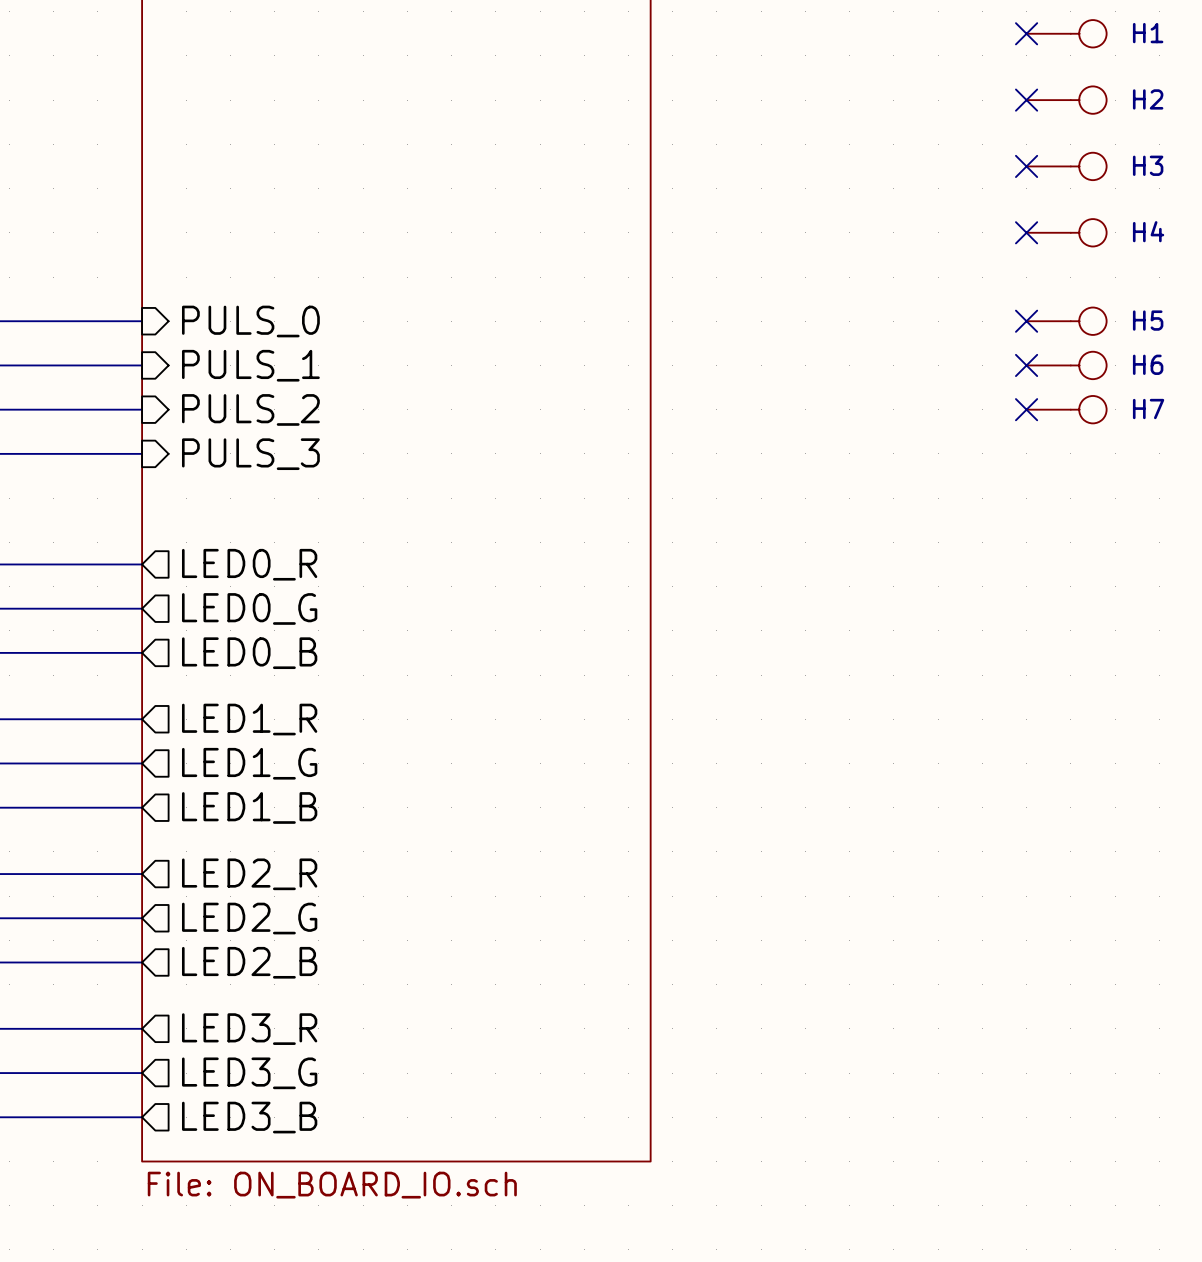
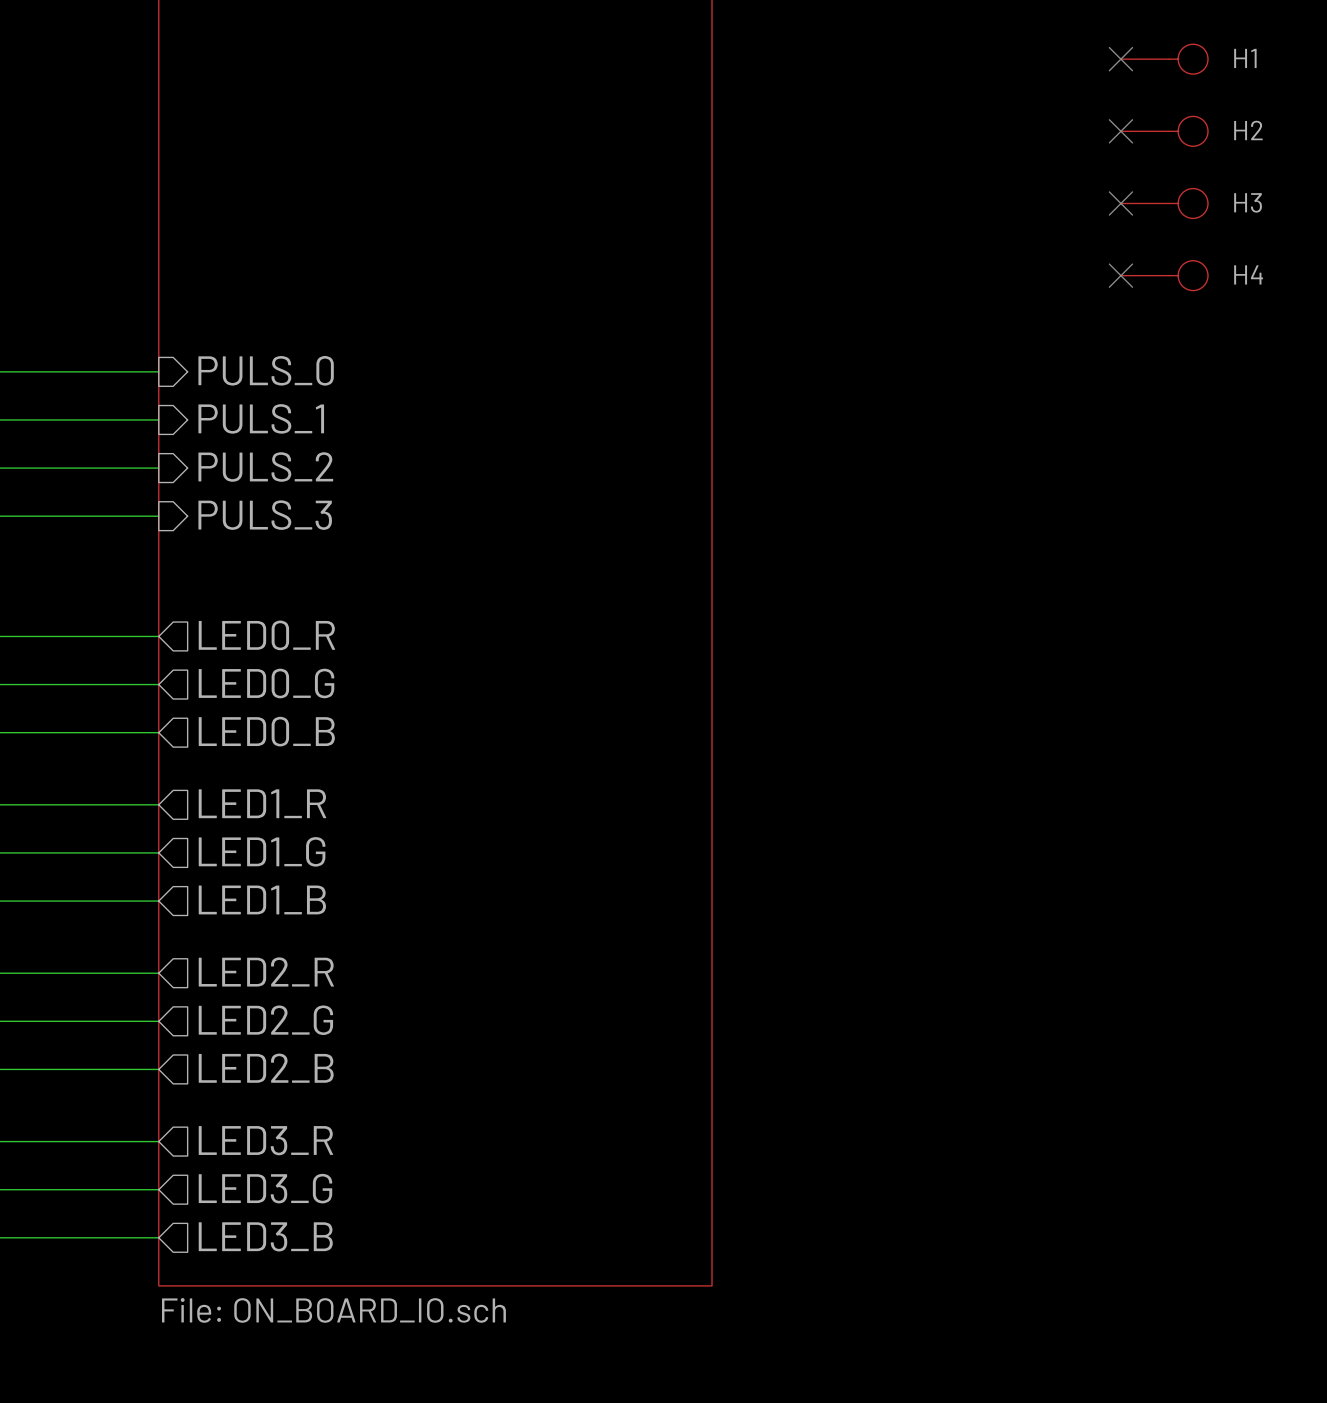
no-connect mark: (1026, 321) -> none
H5: (1066, 321) -> none
no-connect mark: (1026, 365) -> none
H6: (1066, 365) -> none
no-connect mark: (1026, 409) -> none
H7: (1066, 409) -> none

